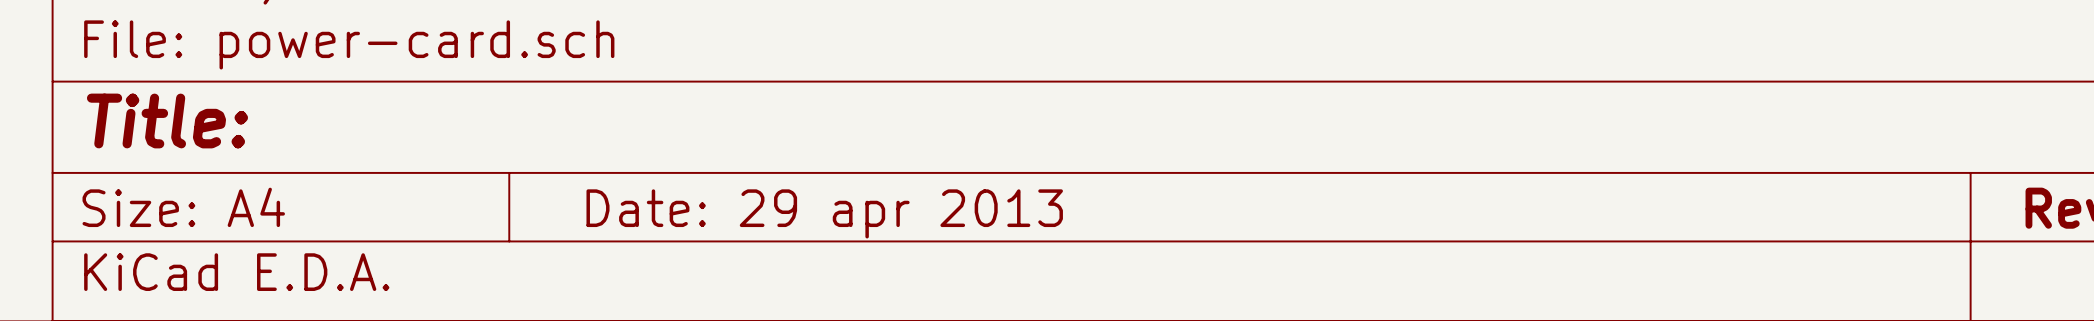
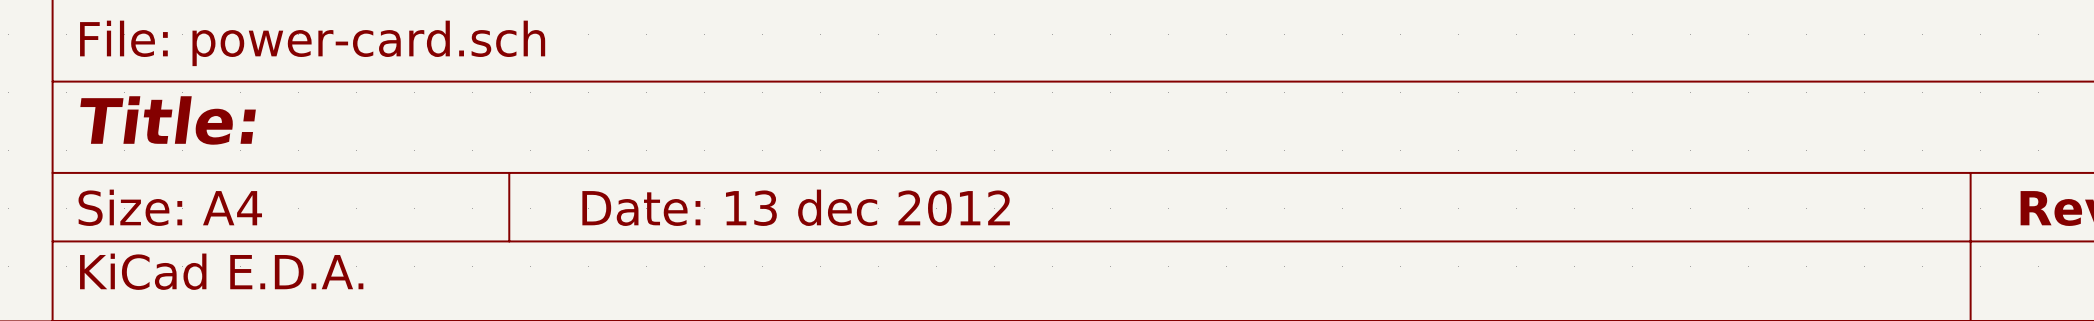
title block: Date: 29 apr 2013 (824, 213) -> Date: 13 dec 2012 (796, 207)

